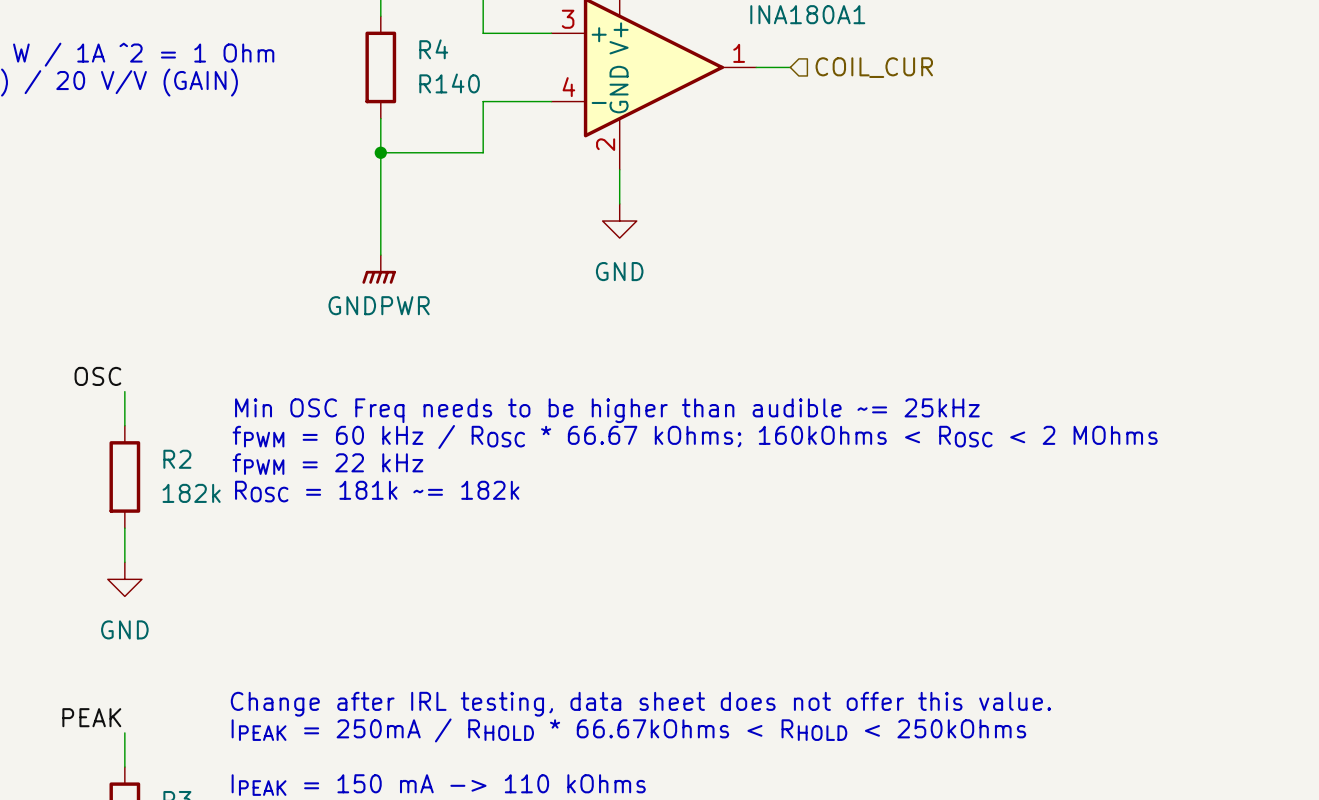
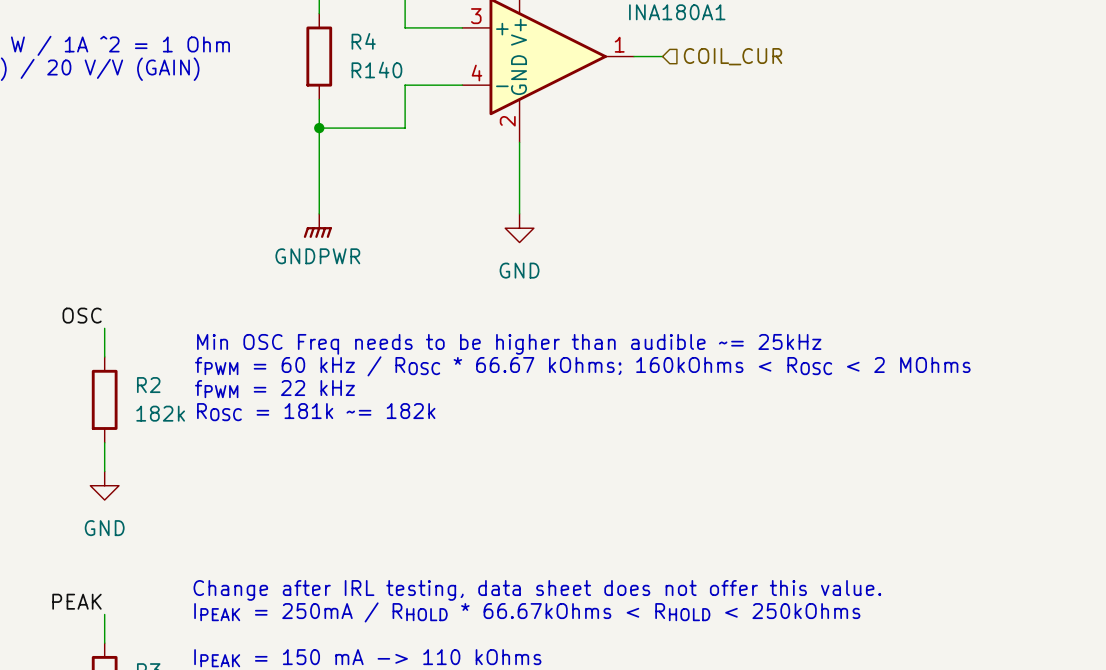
wire: none -> (519, 170) (519, 213)
power symbol position: GND (619, 221) -> GND (519, 228)

